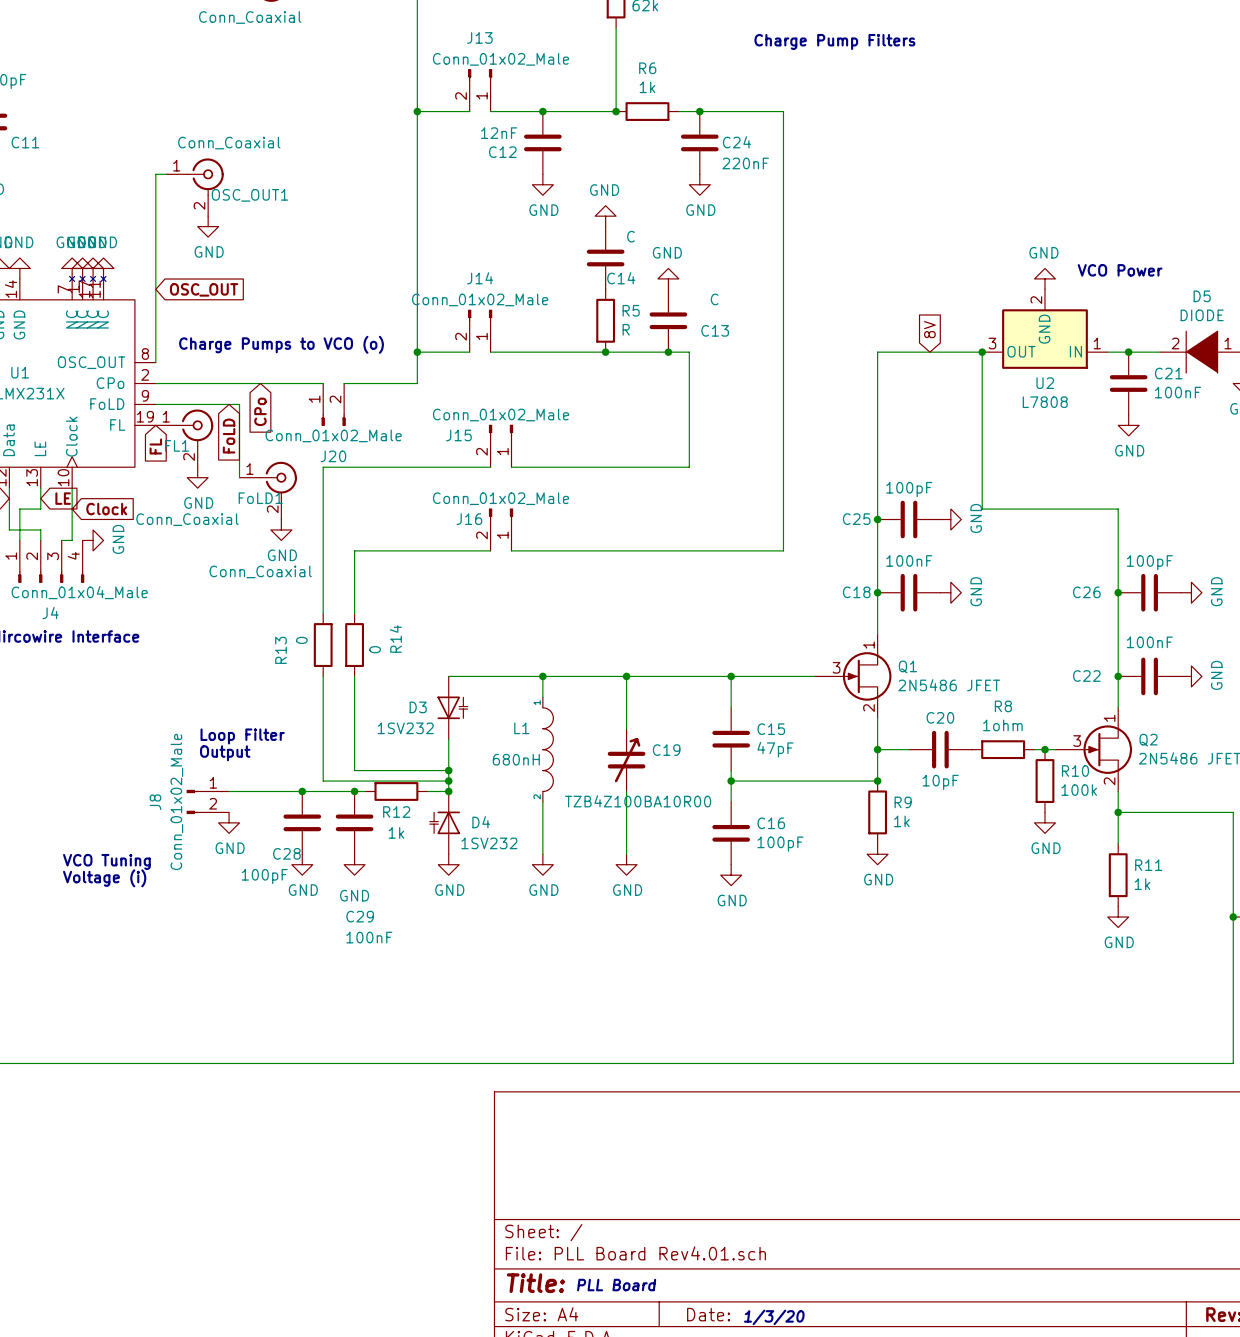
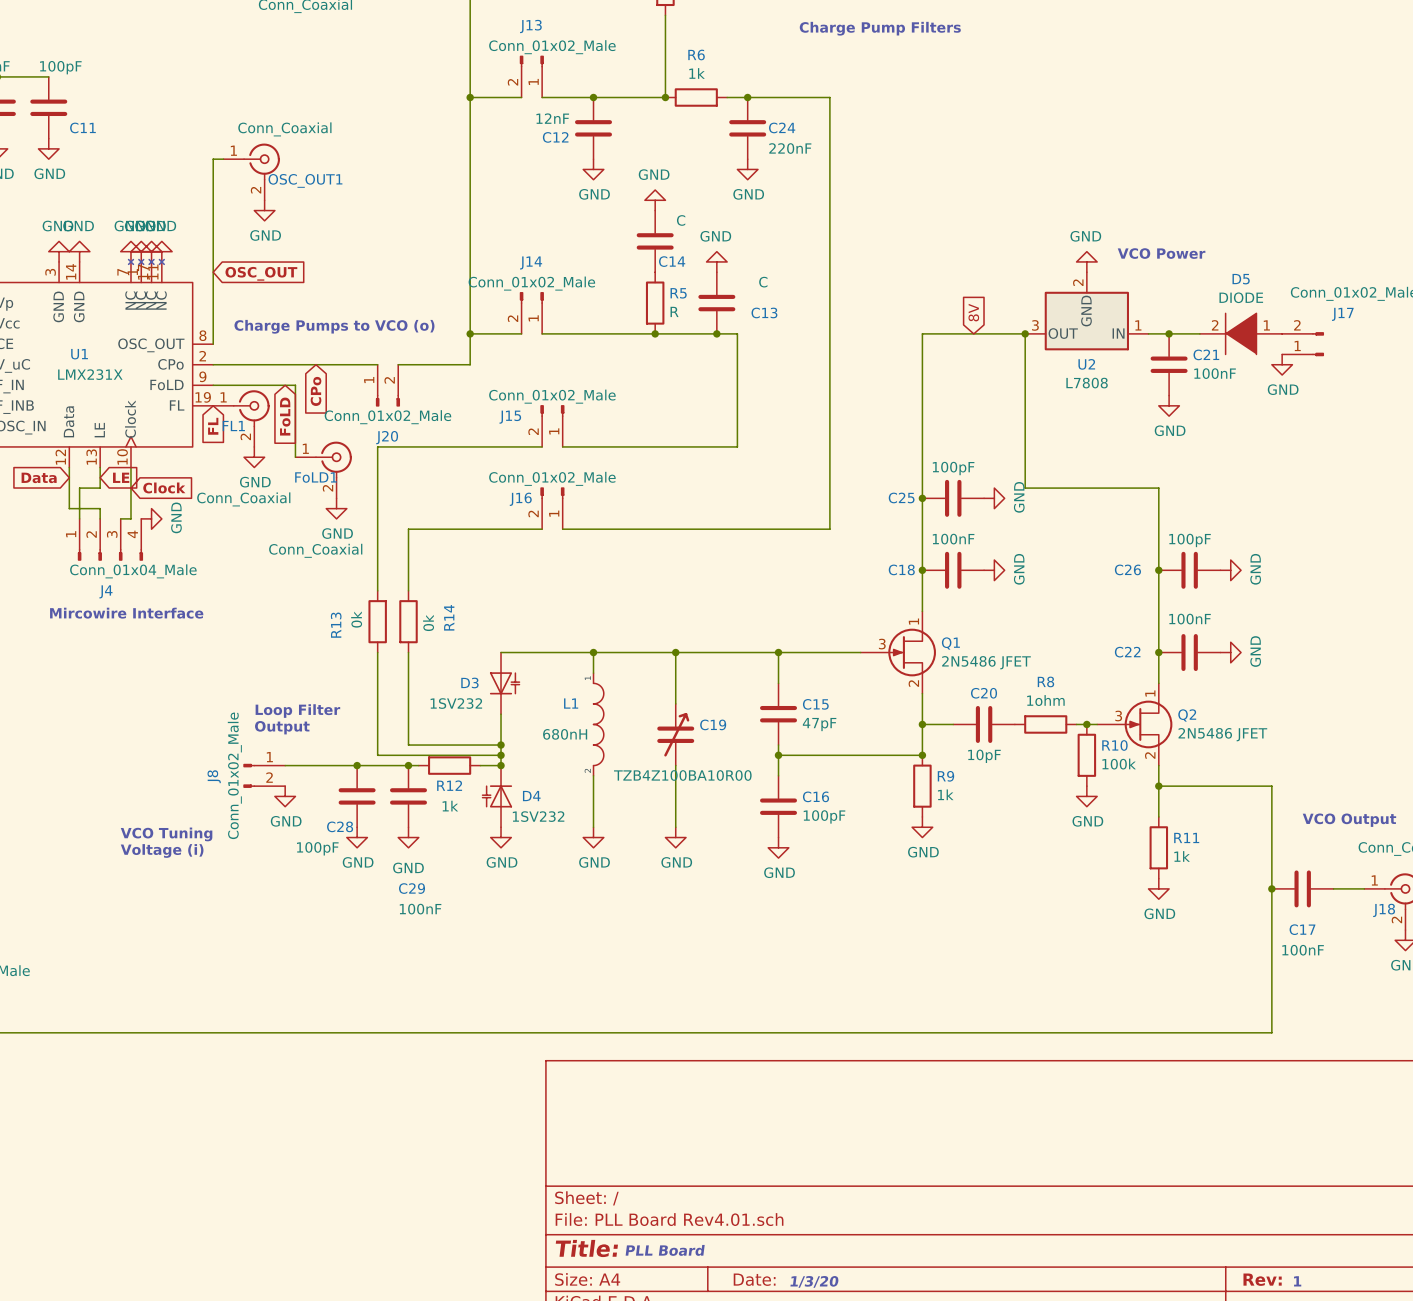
R13 value: 0 (301, 640) -> 0k (356, 619)
R14 value: 0 (375, 649) -> 0k (428, 622)

